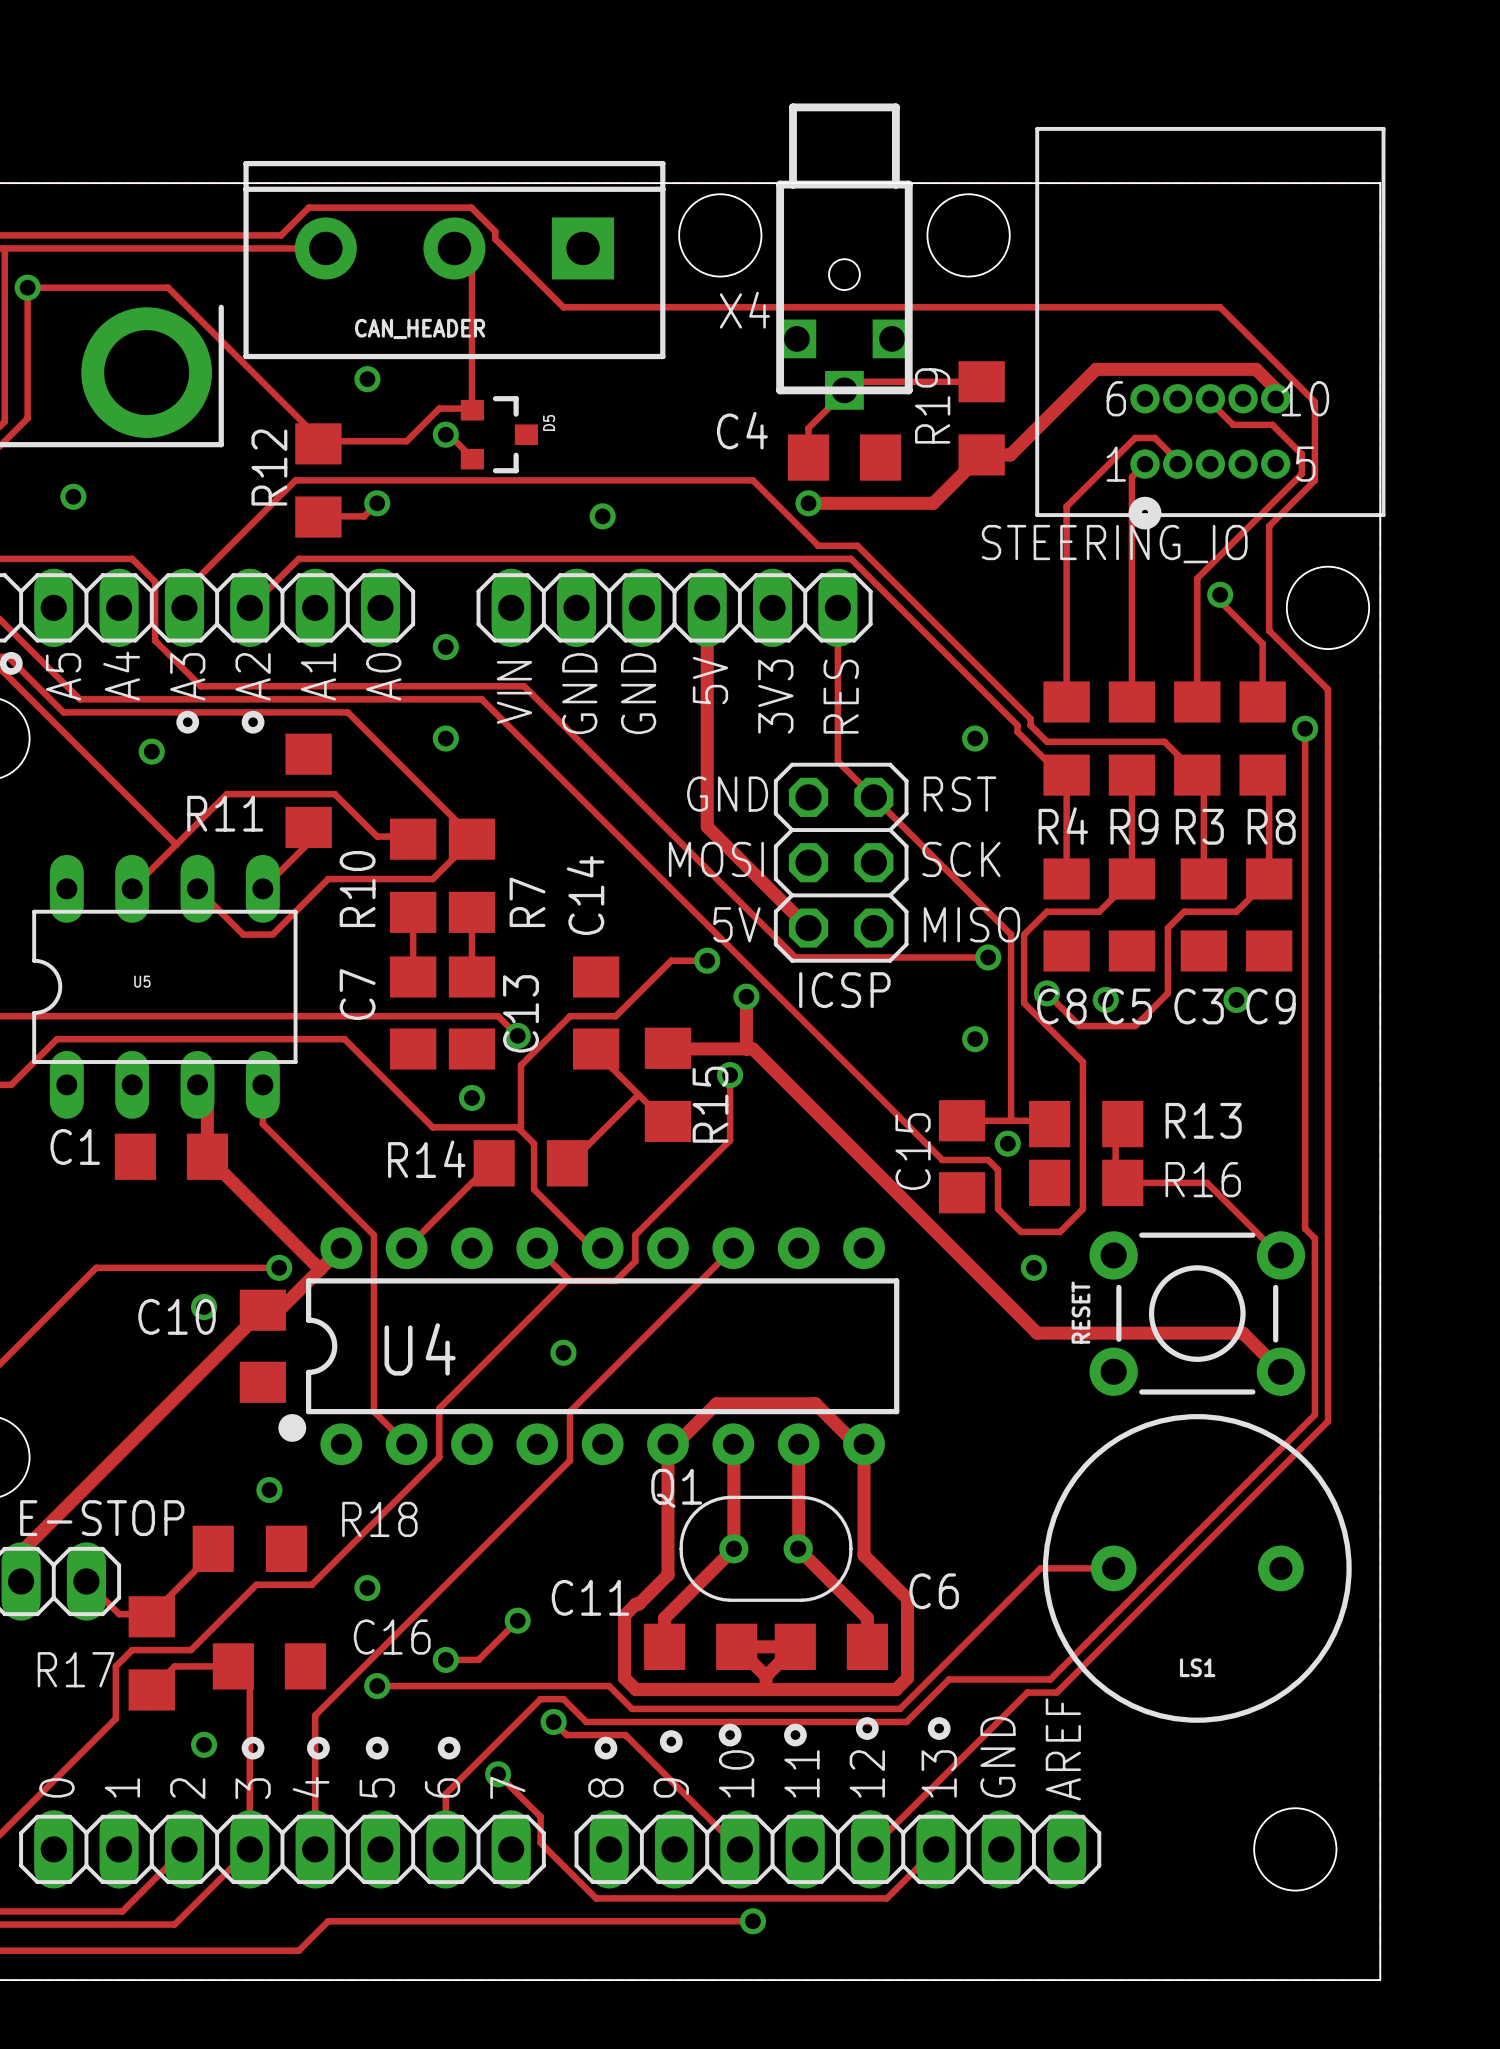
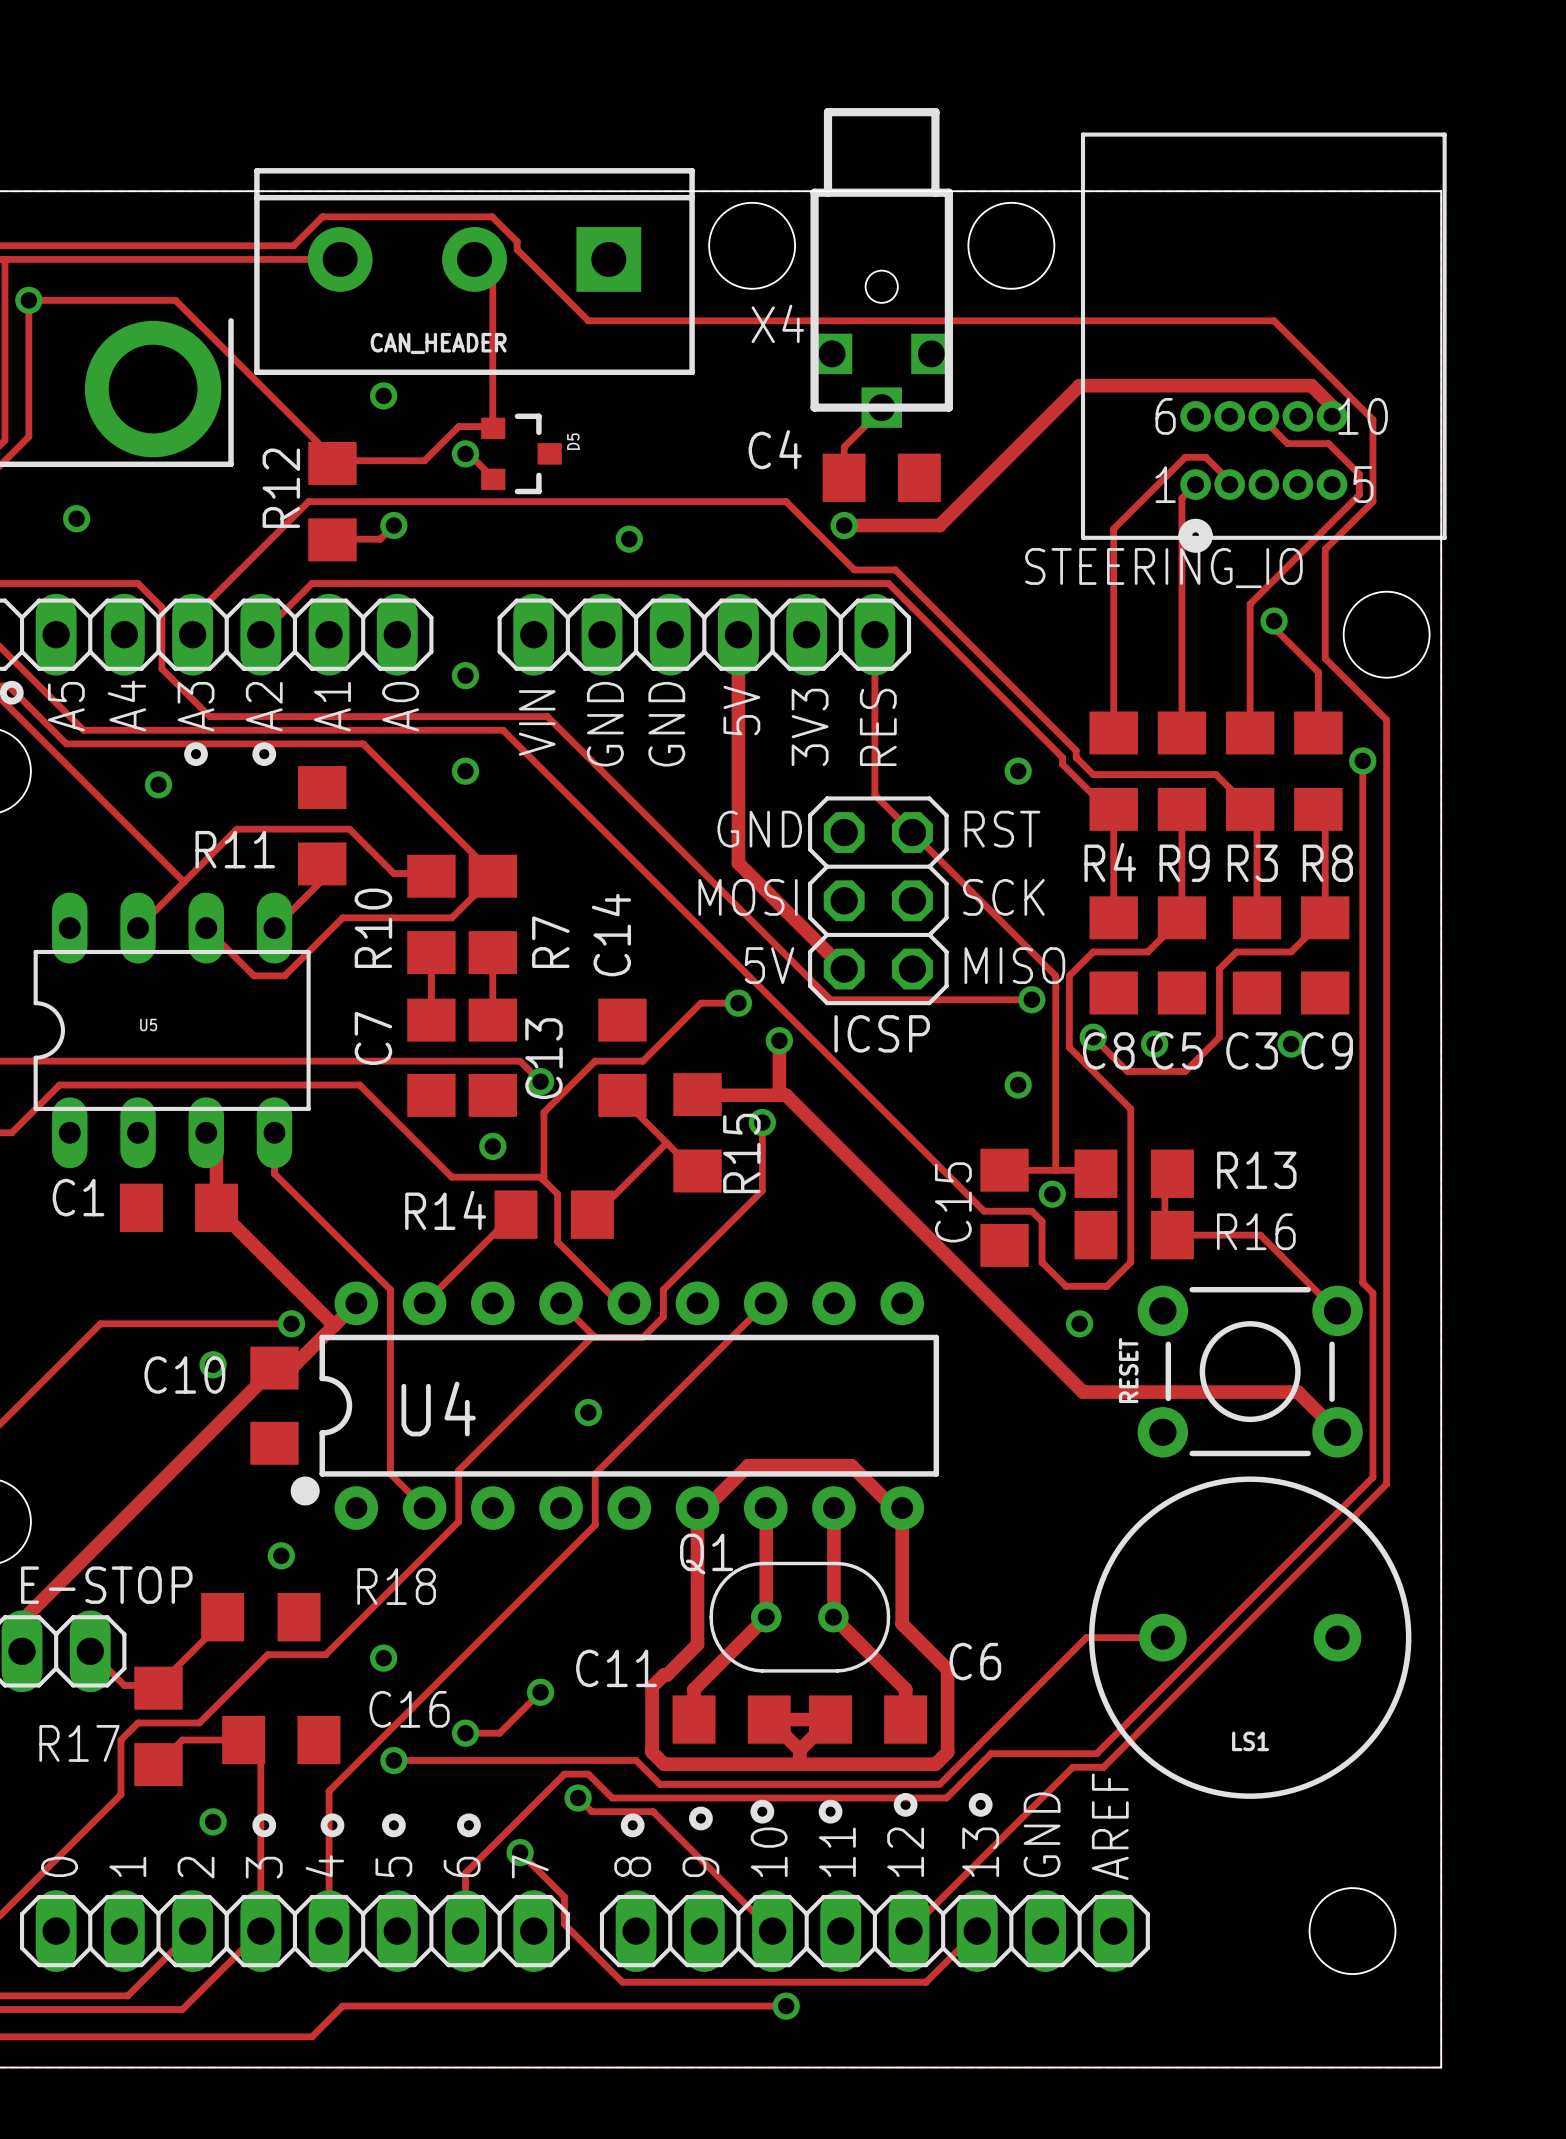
track: (1096, 369) (1010, 454) (981, 454) (933, 503) (899, 503) -> (1144, 385) (1079, 385) (939, 525)
track: (981, 381) (853, 381) (844, 390) -> none
R19: (981, 418) -> none

